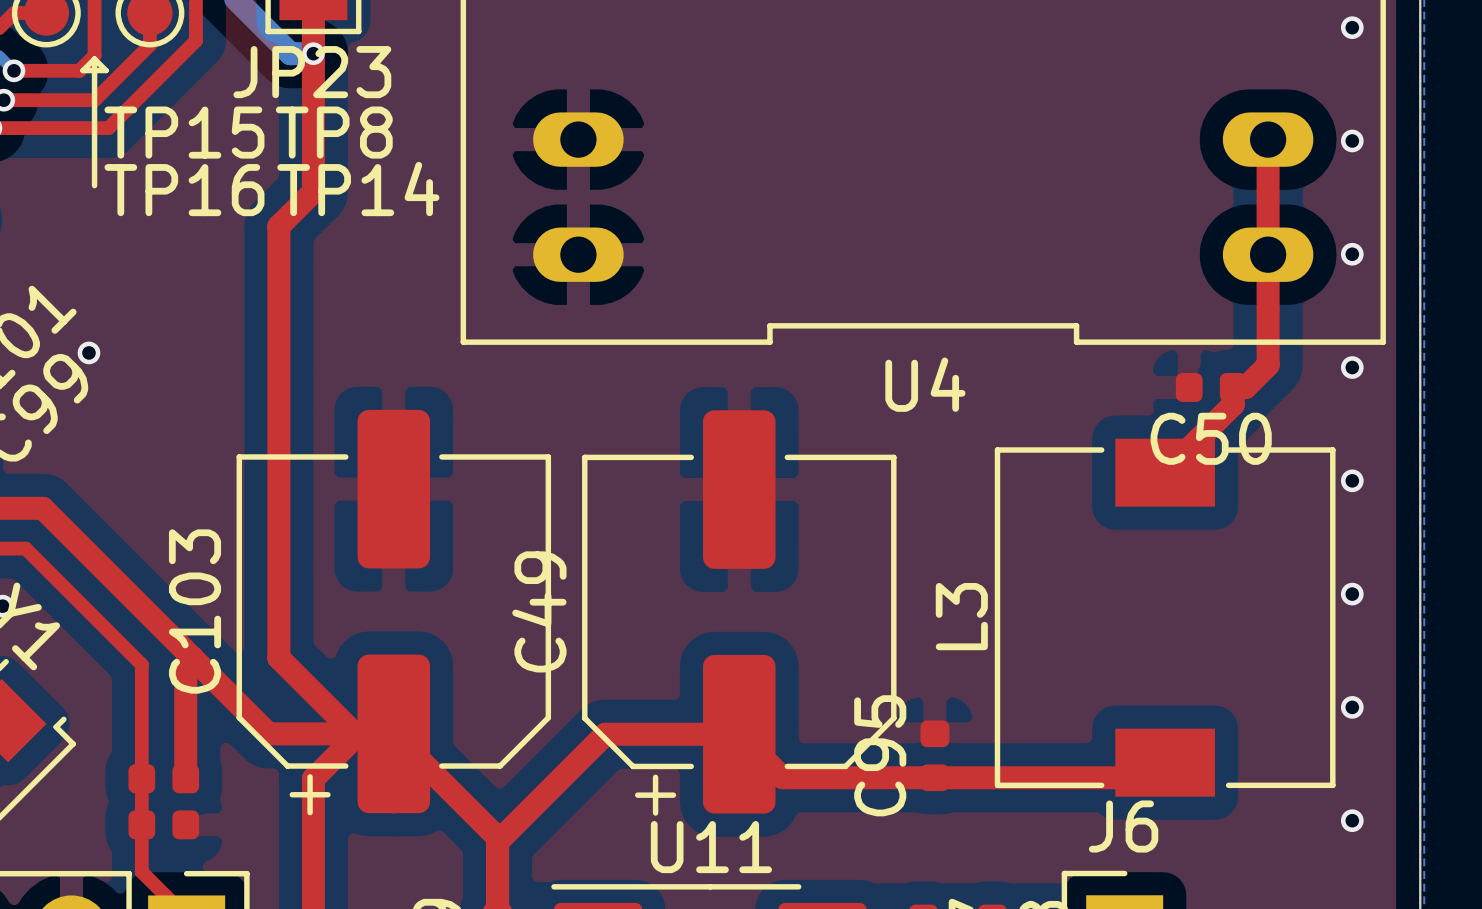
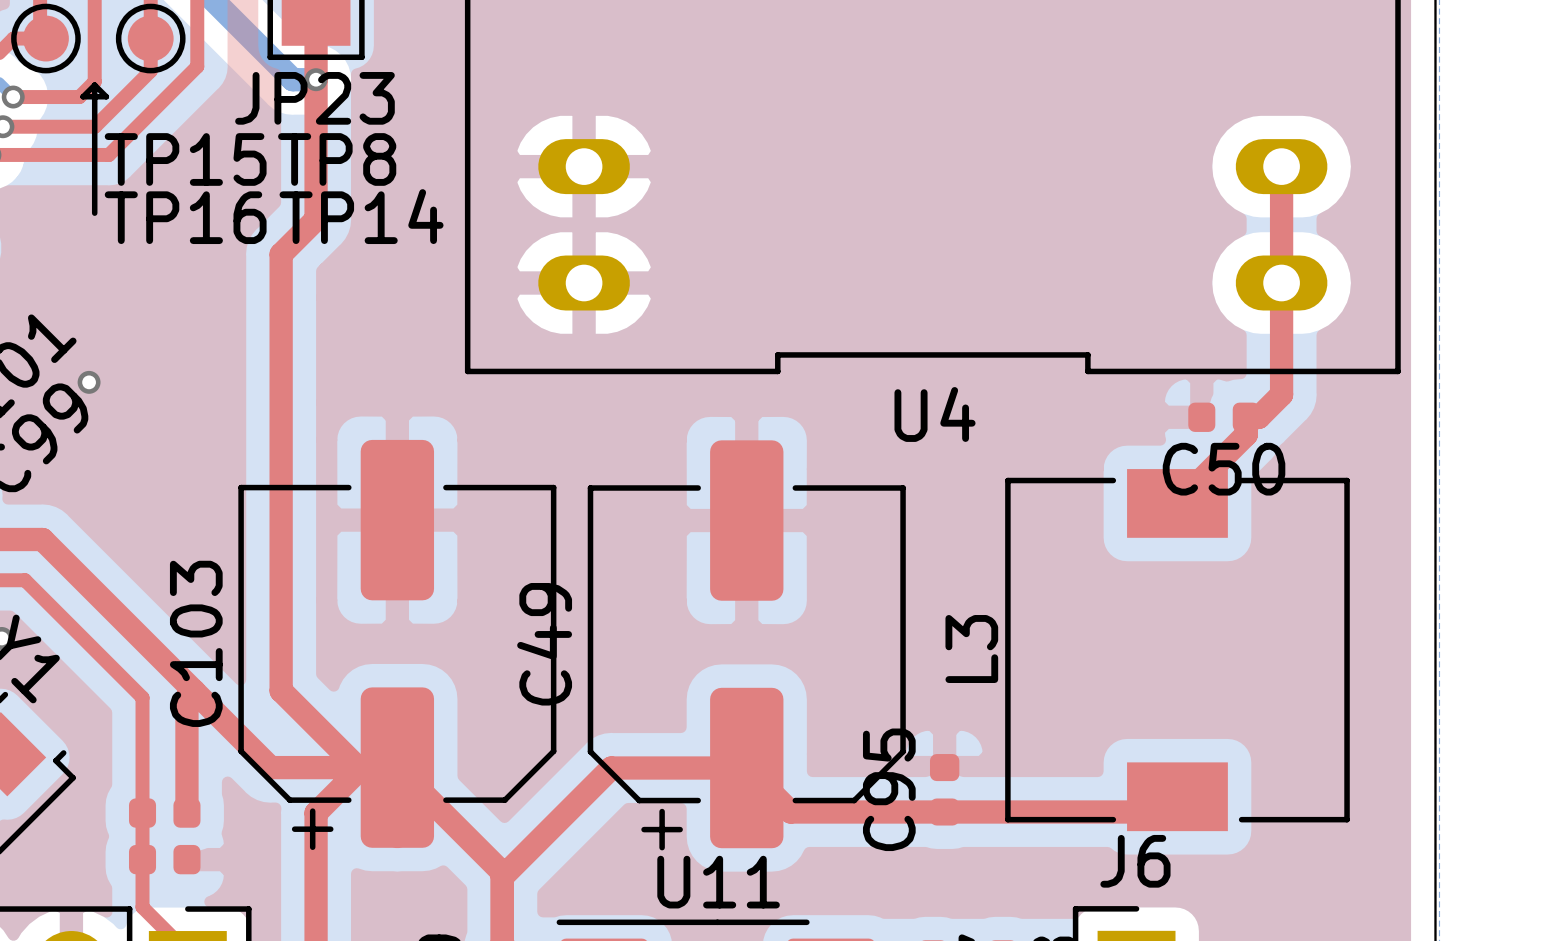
via: (1352, 27) -> none
via: (1352, 140) -> none
via: (1352, 254) -> none
via: (1352, 367) -> none
via: (1352, 480) -> none
via: (1352, 594) -> none
via: (1352, 707) -> none
via: (1352, 820) -> none

